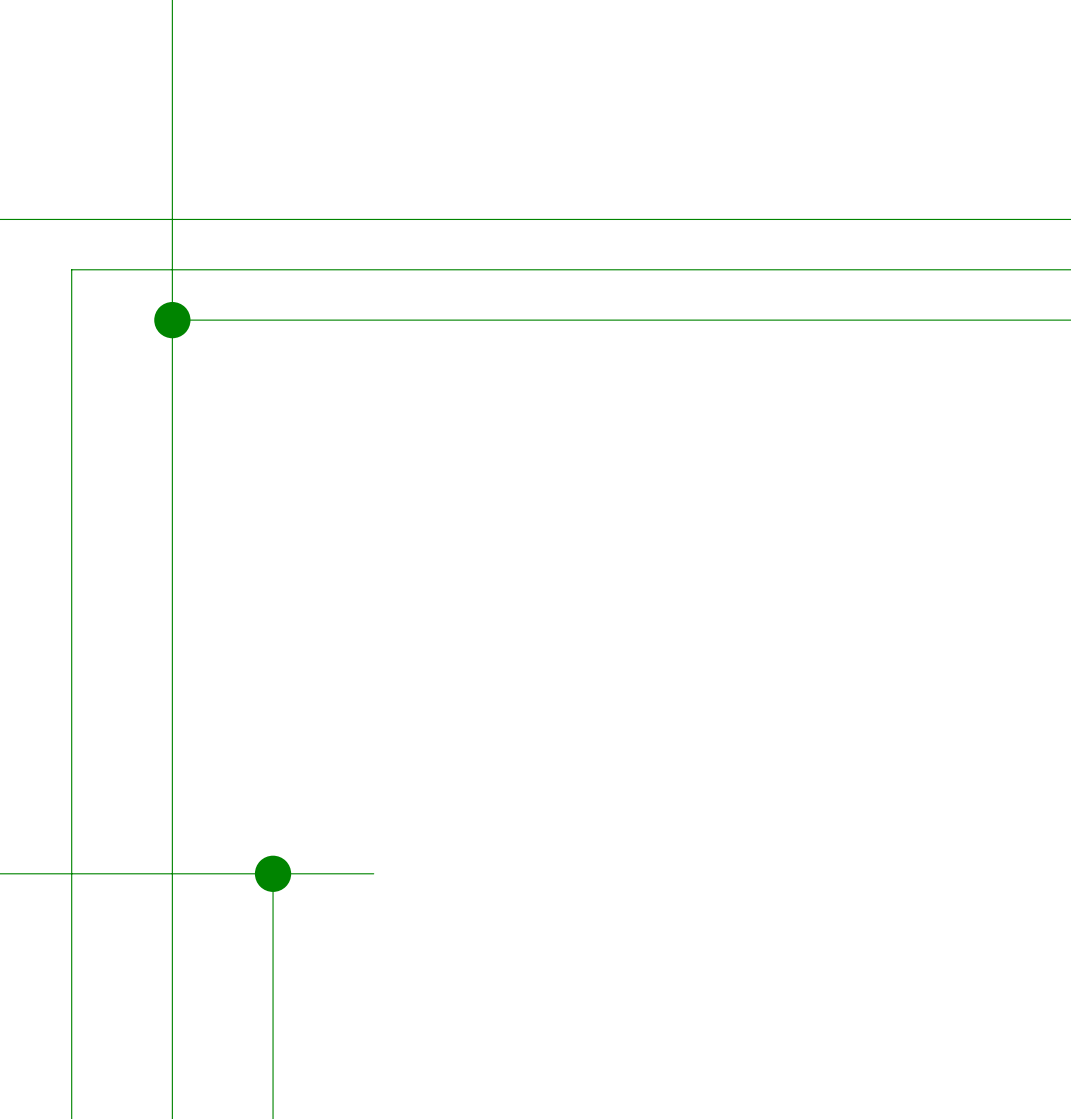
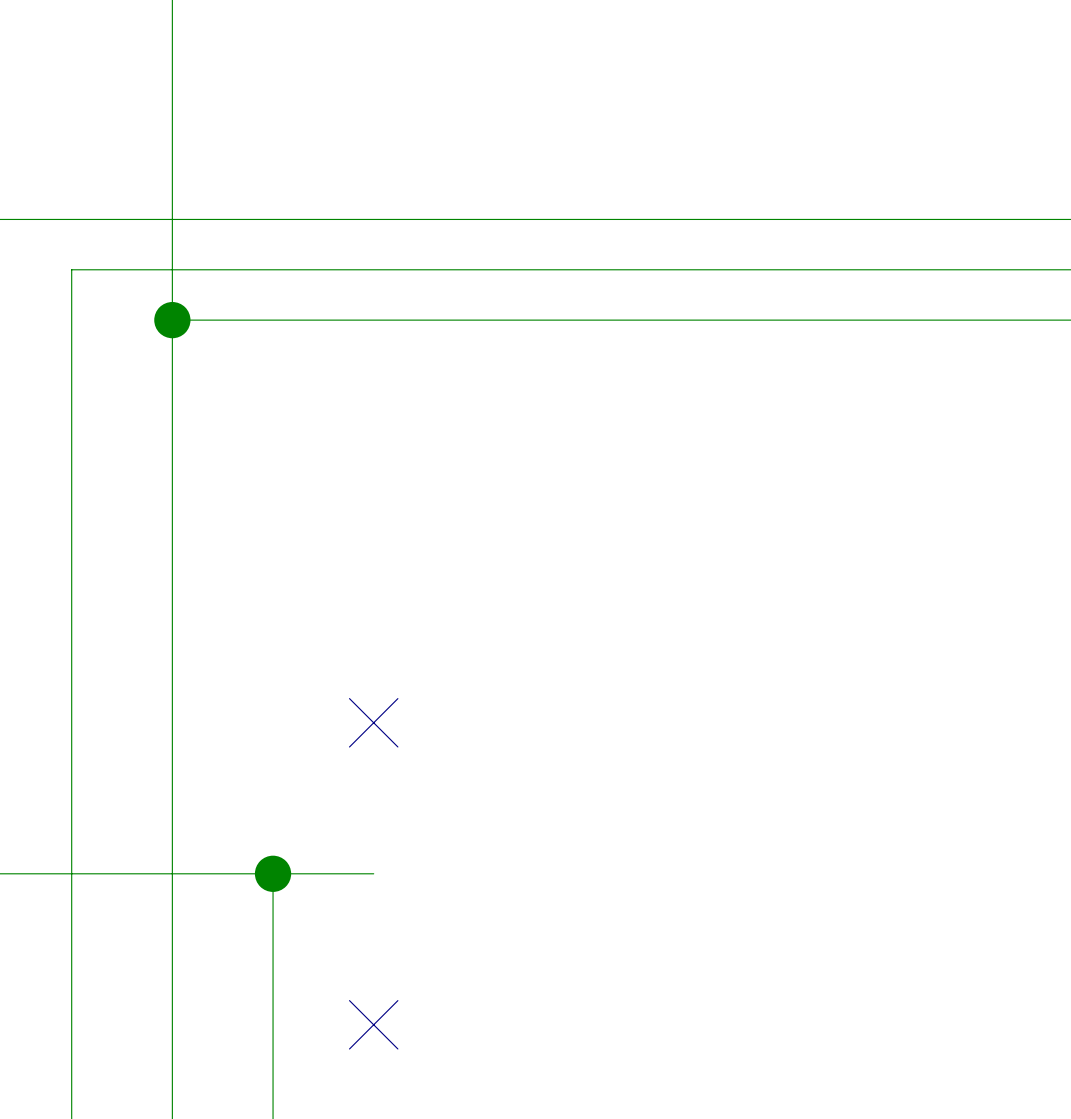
no-connect mark: none -> (373, 722)
no-connect mark: none -> (373, 1024)

